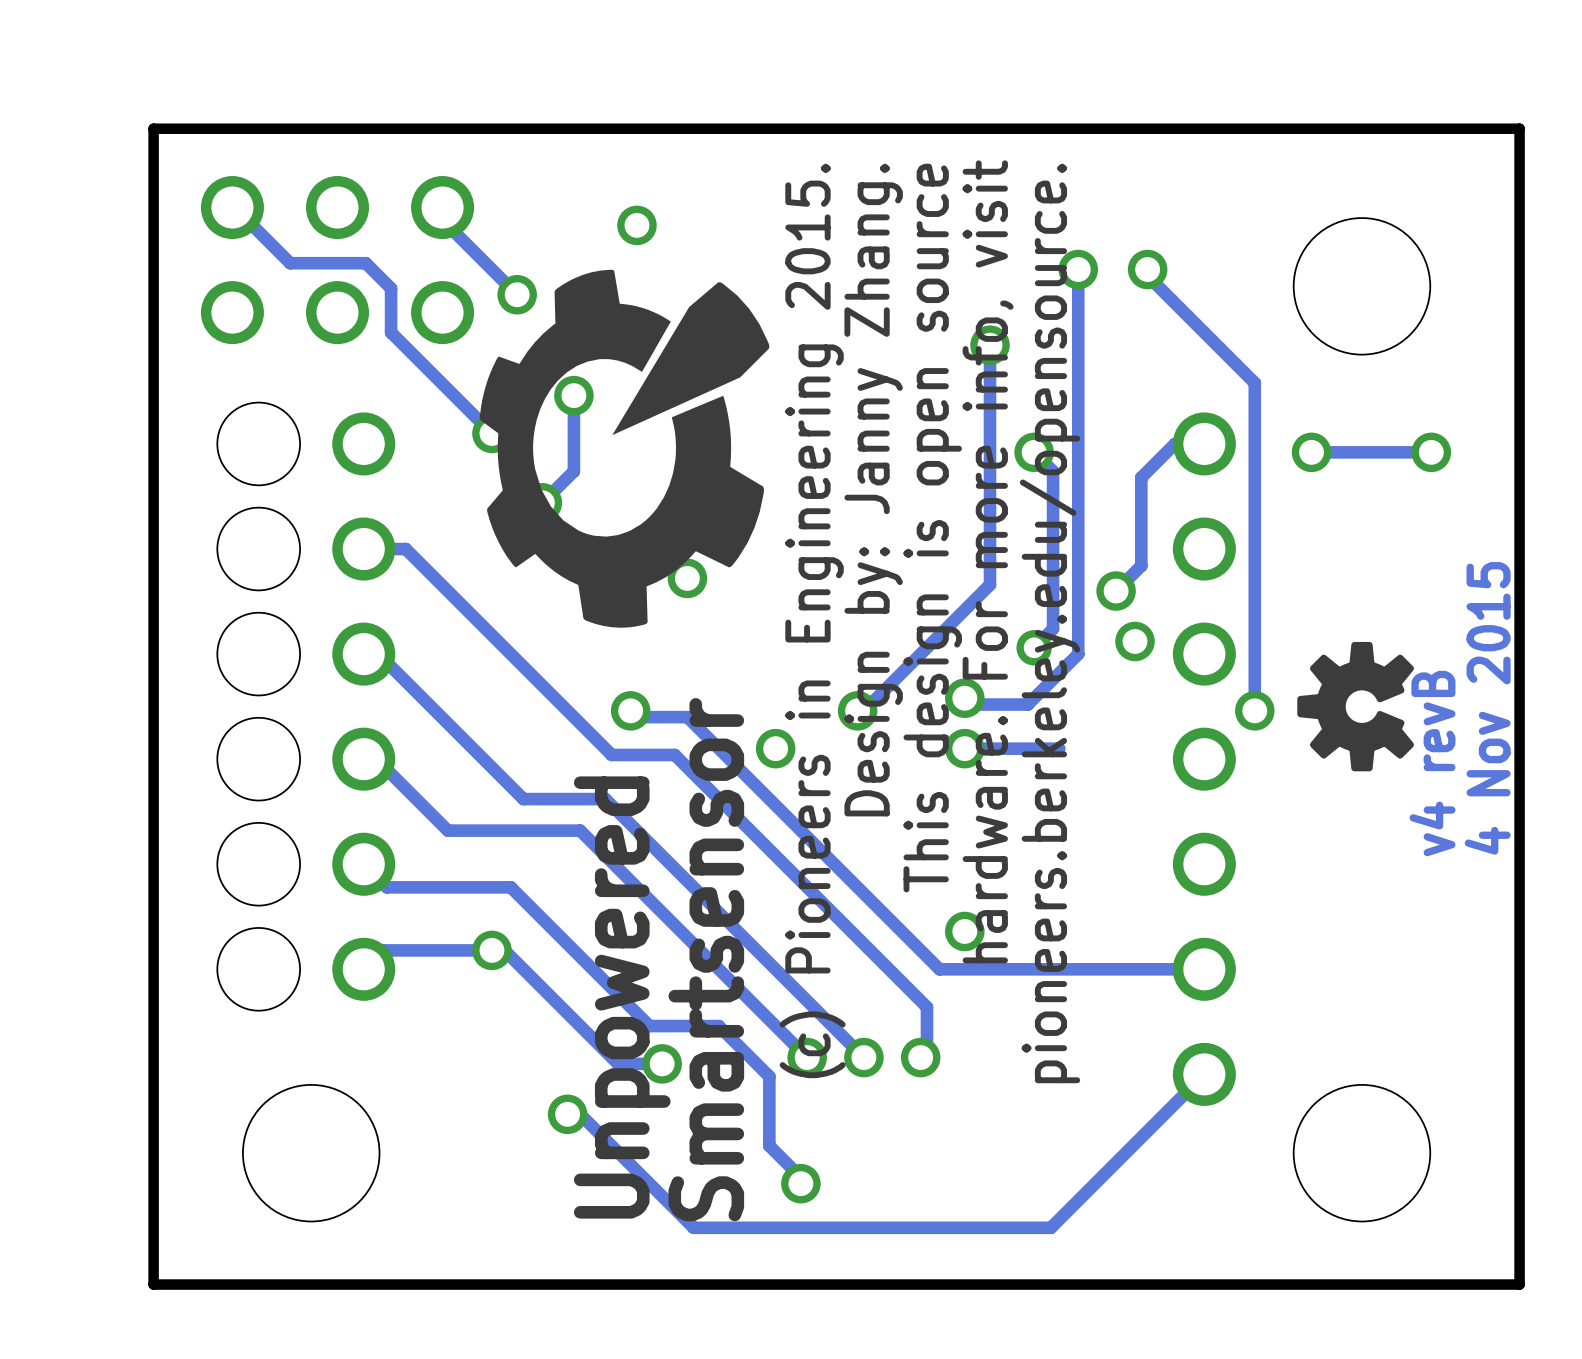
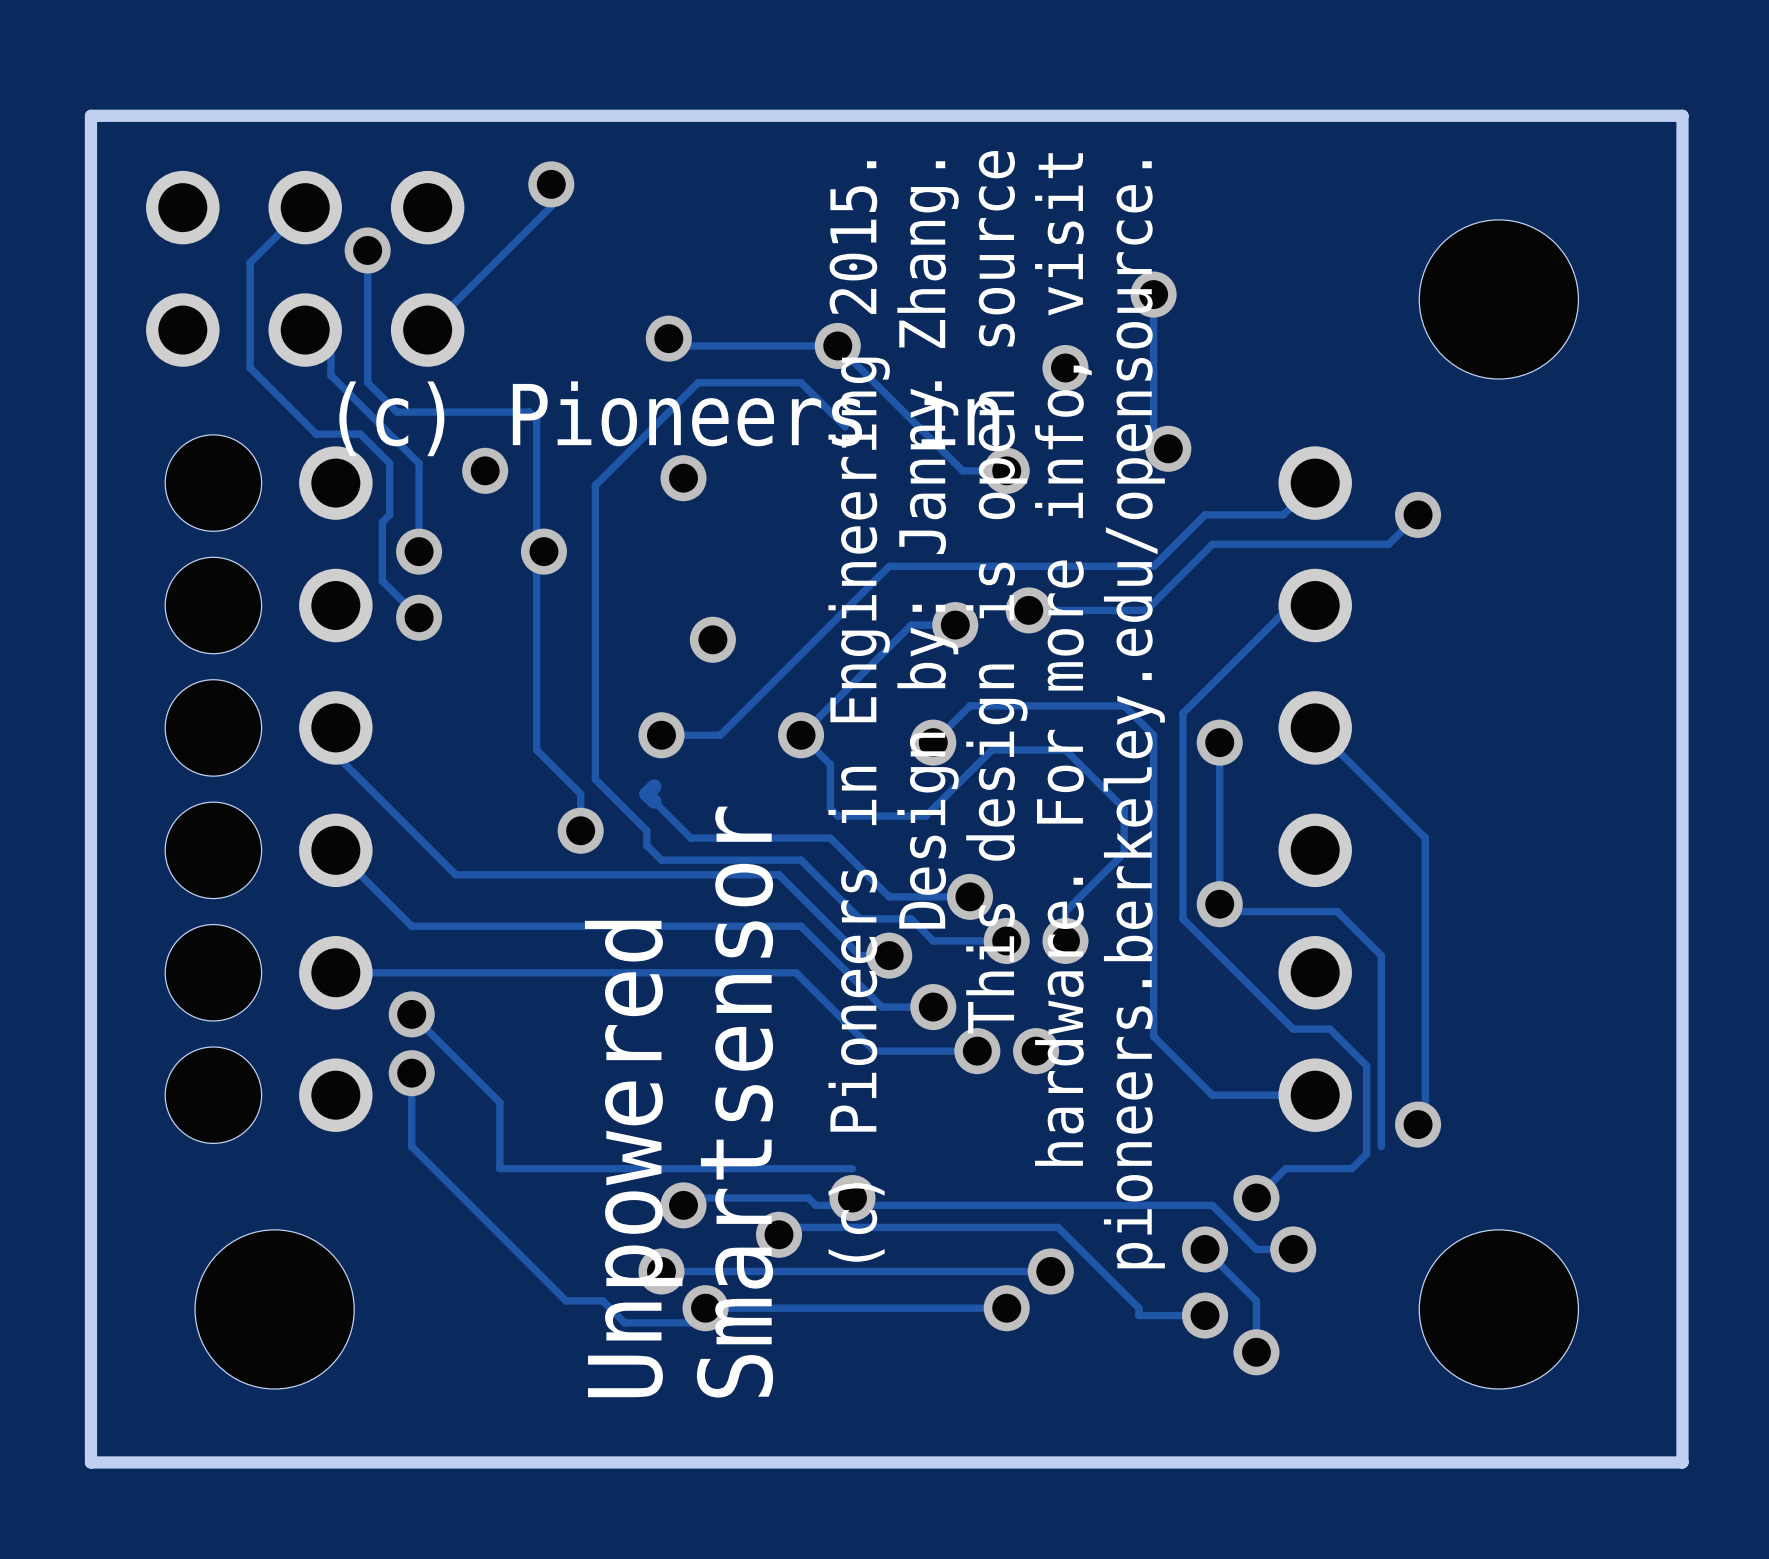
track: none -> (551, 184) (551, 206) (427, 330)
via: none -> (551, 184)
track: (232, 207) (290, 263) (365, 263) (391, 288) -> (367, 250) (367, 301)
track: none -> (305, 207) (250, 262) (250, 368) (316, 434) (360, 434) (389, 463) (389, 514) (382, 522) (382, 581) (419, 617)
track: (442, 207) (442, 220) (517, 294) -> none
via: (636, 225) -> none
via: none -> (367, 250)
drawing: [479, 269, 770, 628] -> none
track: (1078, 269) (1078, 654) (1027, 704) (971, 704) (964, 698) -> none
via position: (1078, 269) -> (1153, 294)
track: (1147, 269) (1147, 275) (1254, 383) (1254, 710) -> none
via: (1147, 269) -> none
track: none -> (1153, 294) (1153, 434) (1168, 448)
track width: thick (391, 288) (391, 332) -> thin (367, 301) (367, 353)
via: (517, 294) -> none
track: none -> (305, 330) (330, 355) (330, 375) (419, 463) (419, 551)
track: none -> (668, 338) (676, 345) (837, 345) (962, 470) (1006, 470)
via: none -> (668, 338)
via: none -> (837, 345)
track: (391, 332) (491, 433) -> (367, 353) (367, 382) (397, 412) (529, 412) (536, 419) (536, 749) (580, 794) (580, 830)
track: (990, 345) (990, 584) (863, 710) (857, 710) -> none
text: none -> (c) Pioneers in (669, 418)
track: (573, 395) (573, 471) (542, 502) -> none
via: (573, 395) -> none
track: none -> (845, 426) (801, 382) (698, 382) (595, 485) (595, 779) (646, 830) (646, 845) (661, 860) (801, 860) (859, 918) (911, 918) (933, 940) (1006, 940)
via: none -> (1168, 448)
via: none -> (1006, 470)
via: none -> (683, 478)
track: (1204, 443) (1174, 443) (1141, 477) (1141, 565) (1116, 591) -> (1315, 483) (1283, 514) (1205, 514) (1153, 566) (889, 566) (720, 735) (661, 735)
track: (1034, 452) (1053, 471) (1053, 628) (1034, 647) -> none
via: (1034, 452) -> none
via position: (1311, 452) -> (1418, 514)
track: (1431, 452) (1311, 452) -> none
via: (1431, 452) -> none
track: none -> (1418, 514) (1388, 544) (1212, 544) (1146, 610) (1028, 610)
via: none -> (419, 551)
track: (363, 549) (405, 549) (611, 754) (674, 754) (926, 1007) (926, 1051) (920, 1057) -> none
track: none -> (1315, 605) (1290, 605) (1183, 713) (1183, 918) (1293, 1029) (1329, 1029) (1366, 1065) (1366, 1153) (1351, 1168) (1285, 1168) (1256, 1198)
via: none -> (1028, 610)
via: none -> (419, 617)
track: none -> (955, 625) (911, 625) (801, 735) (830, 764) (830, 808) (837, 816) (925, 816) (992, 749) (1065, 749) (1124, 808) (1124, 852) (1065, 911) (1065, 940)
via: none -> (955, 625)
via: (1116, 591) -> none
via position: (1135, 641) -> (1219, 742)
drawing: [1297, 641, 1414, 772] -> none
via: (1034, 647) -> none
track: (363, 654) (378, 654) (523, 799) (605, 799) (863, 1057) -> (335, 727) (335, 754) (455, 874) (779, 874) (859, 955) (889, 955)
track: none -> (1315, 727) (1425, 838) (1425, 1102) (1418, 1109) (1418, 1124)
via: none -> (661, 735)
via: none -> (801, 735)
via: none -> (933, 742)
track: none -> (1219, 742) (1219, 904) (1227, 911) (1337, 911) (1381, 955) (1381, 1146)
via: (964, 698) -> none
part: none -> (1315, 789)
text: 4 Nov 2015 (1487, 708) -> none
via: (630, 710) -> none
via: (857, 710) -> none
via: (1254, 710) -> none
track: (636, 717) (687, 717) (939, 969) (1116, 969) -> (933, 742) (969, 705) (1124, 705) (1153, 735) (1153, 1036) (1212, 1095)
track: none -> (654, 801) (690, 838) (830, 838) (889, 896) (969, 896)
via: none -> (580, 830)
via: (775, 748) -> none
via: (964, 748) -> none
track: (1059, 748) (964, 748) -> none
track: (363, 759) (376, 759) (447, 830) (580, 830) (807, 1057) -> (335, 850) (411, 926) (801, 926) (881, 1007) (933, 1007)
part: (1204, 759) -> none
text: v4 revB (1432, 763) -> none
via: none -> (969, 896)
via: none -> (1219, 904)
via: none -> (1006, 940)
via: none -> (1065, 940)
via: none -> (889, 955)
track: (363, 864) (386, 887) (510, 887) (649, 1026) (718, 1026) (769, 1076) (769, 1145) (800, 1177) (800, 1183) -> (335, 972) (796, 972) (874, 1051) (977, 1051)
via: none -> (933, 1007)
track: none -> (411, 1014) (499, 1102) (499, 1168) (852, 1168)
via: none -> (411, 1014)
via: none -> (977, 1051)
track: none -> (411, 1073) (411, 1146) (565, 1300) (602, 1300) (624, 1322) (690, 1322) (705, 1308) (1006, 1308)
via: none -> (411, 1073)
via: (491, 950) -> none
track: (363, 969) (382, 950) (504, 950) (618, 1063) (662, 1063) -> none
track width: thick (1204, 969) (1116, 969) -> thin (1315, 1095) (1212, 1095)
via: none -> (1418, 1124)
via: (863, 1057) -> none
via: (920, 1057) -> none
via: none -> (1256, 1198)
track: none -> (676, 1205) (683, 1198) (808, 1198) (815, 1205) (1212, 1205) (1256, 1249) (1293, 1249)
track: (1204, 1074) (1050, 1227) (693, 1227) (580, 1114) (567, 1114) -> none
track: none -> (779, 1234) (786, 1227) (1058, 1227) (1138, 1308) (1138, 1315) (1205, 1315)
via: none -> (779, 1234)
track: none -> (1205, 1249) (1256, 1300) (1256, 1352)
via: none -> (1205, 1249)
via: none -> (1293, 1249)
via: (567, 1114) -> none
via: none -> (661, 1271)
track: none -> (1050, 1271) (661, 1271)
via: none -> (1050, 1271)
via: none -> (705, 1308)
via: none -> (1006, 1308)
via: none -> (1205, 1315)
via: (800, 1183) -> none
via: none -> (1256, 1352)

